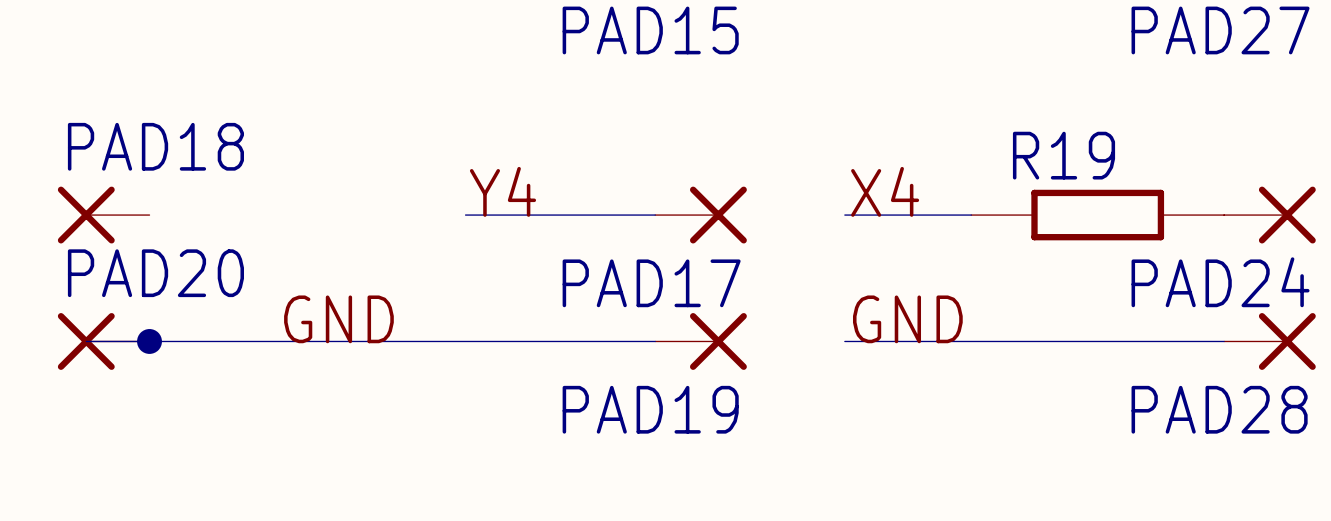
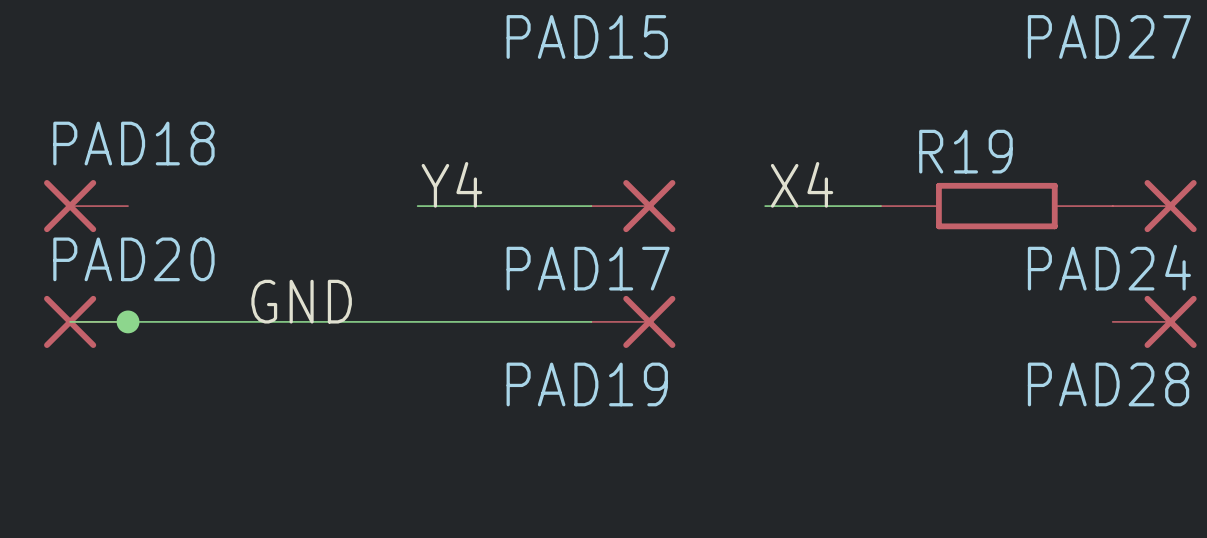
label: GND (907, 319) -> none
wire: (844, 341) (1224, 341) -> none

